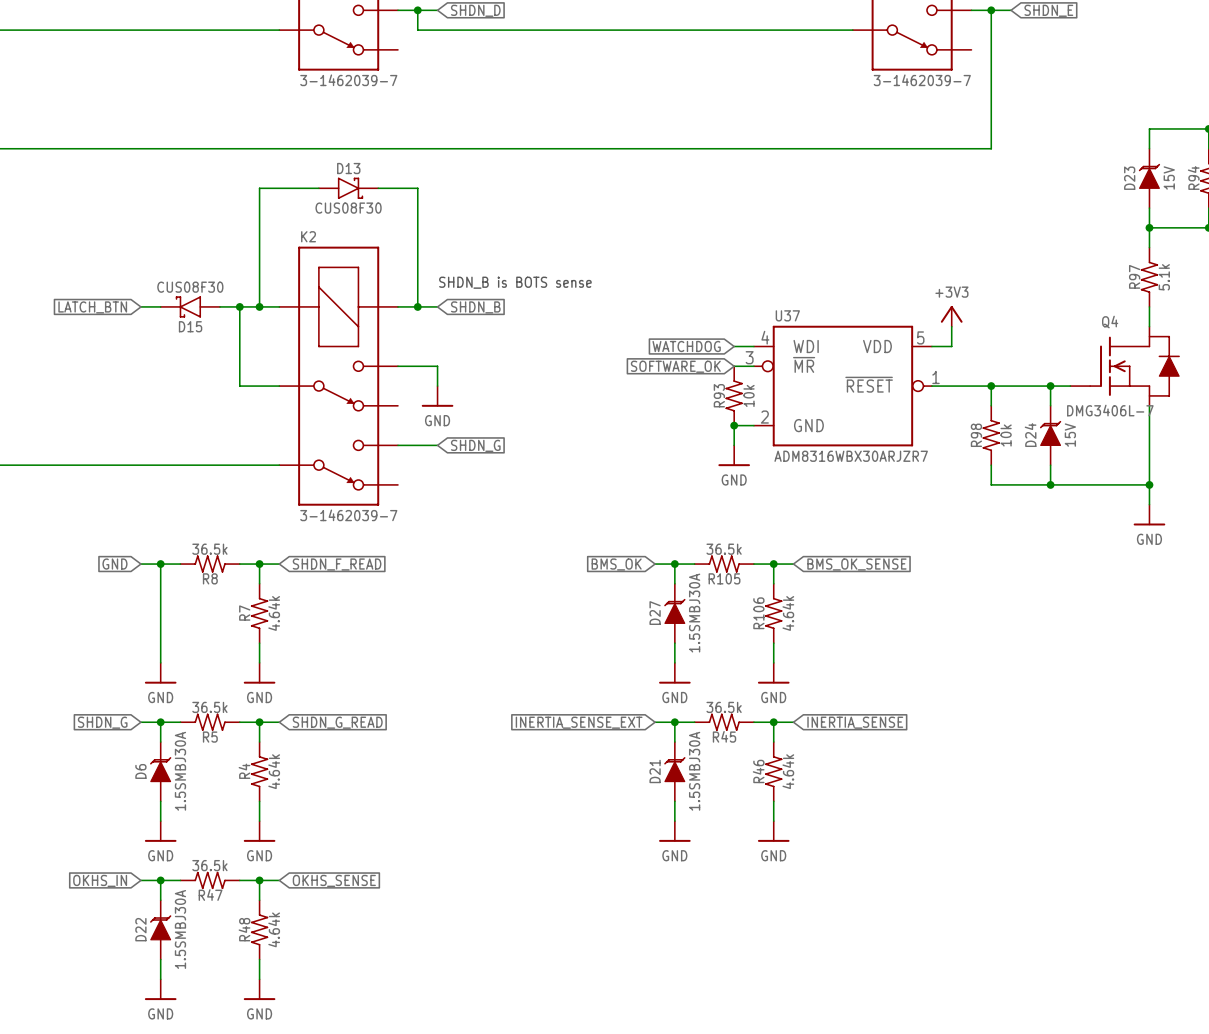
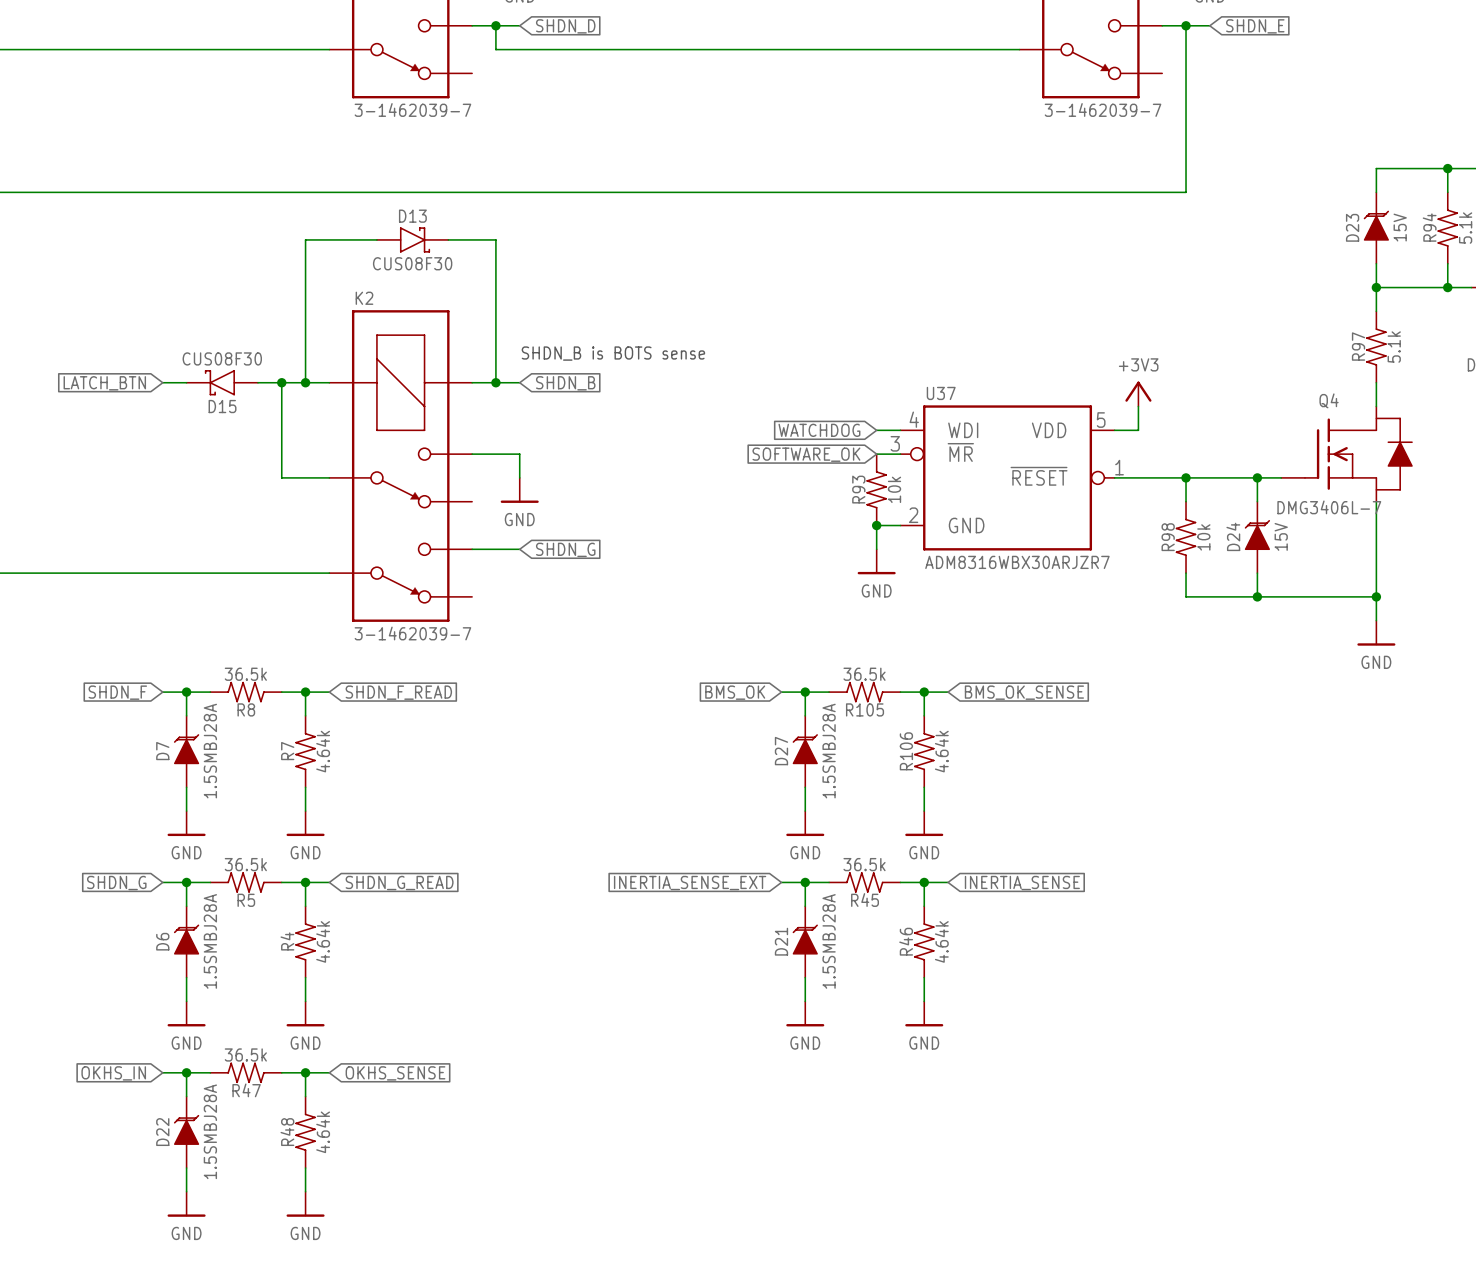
global label: GND (114, 564) -> SHDN_F (117, 692)
D7: none -> (186, 751)
D27 text: 1.5SMBJ30A (694, 613) -> 1.5SMBJ28A (829, 751)
D6 text: 1.5SMBJ30A (180, 771) -> 1.5SMBJ28A (210, 941)
D21 text: 1.5SMBJ30A (694, 771) -> 1.5SMBJ28A (829, 941)
D22 text: 1.5SMBJ30A (180, 929) -> 1.5SMBJ28A (210, 1131)

